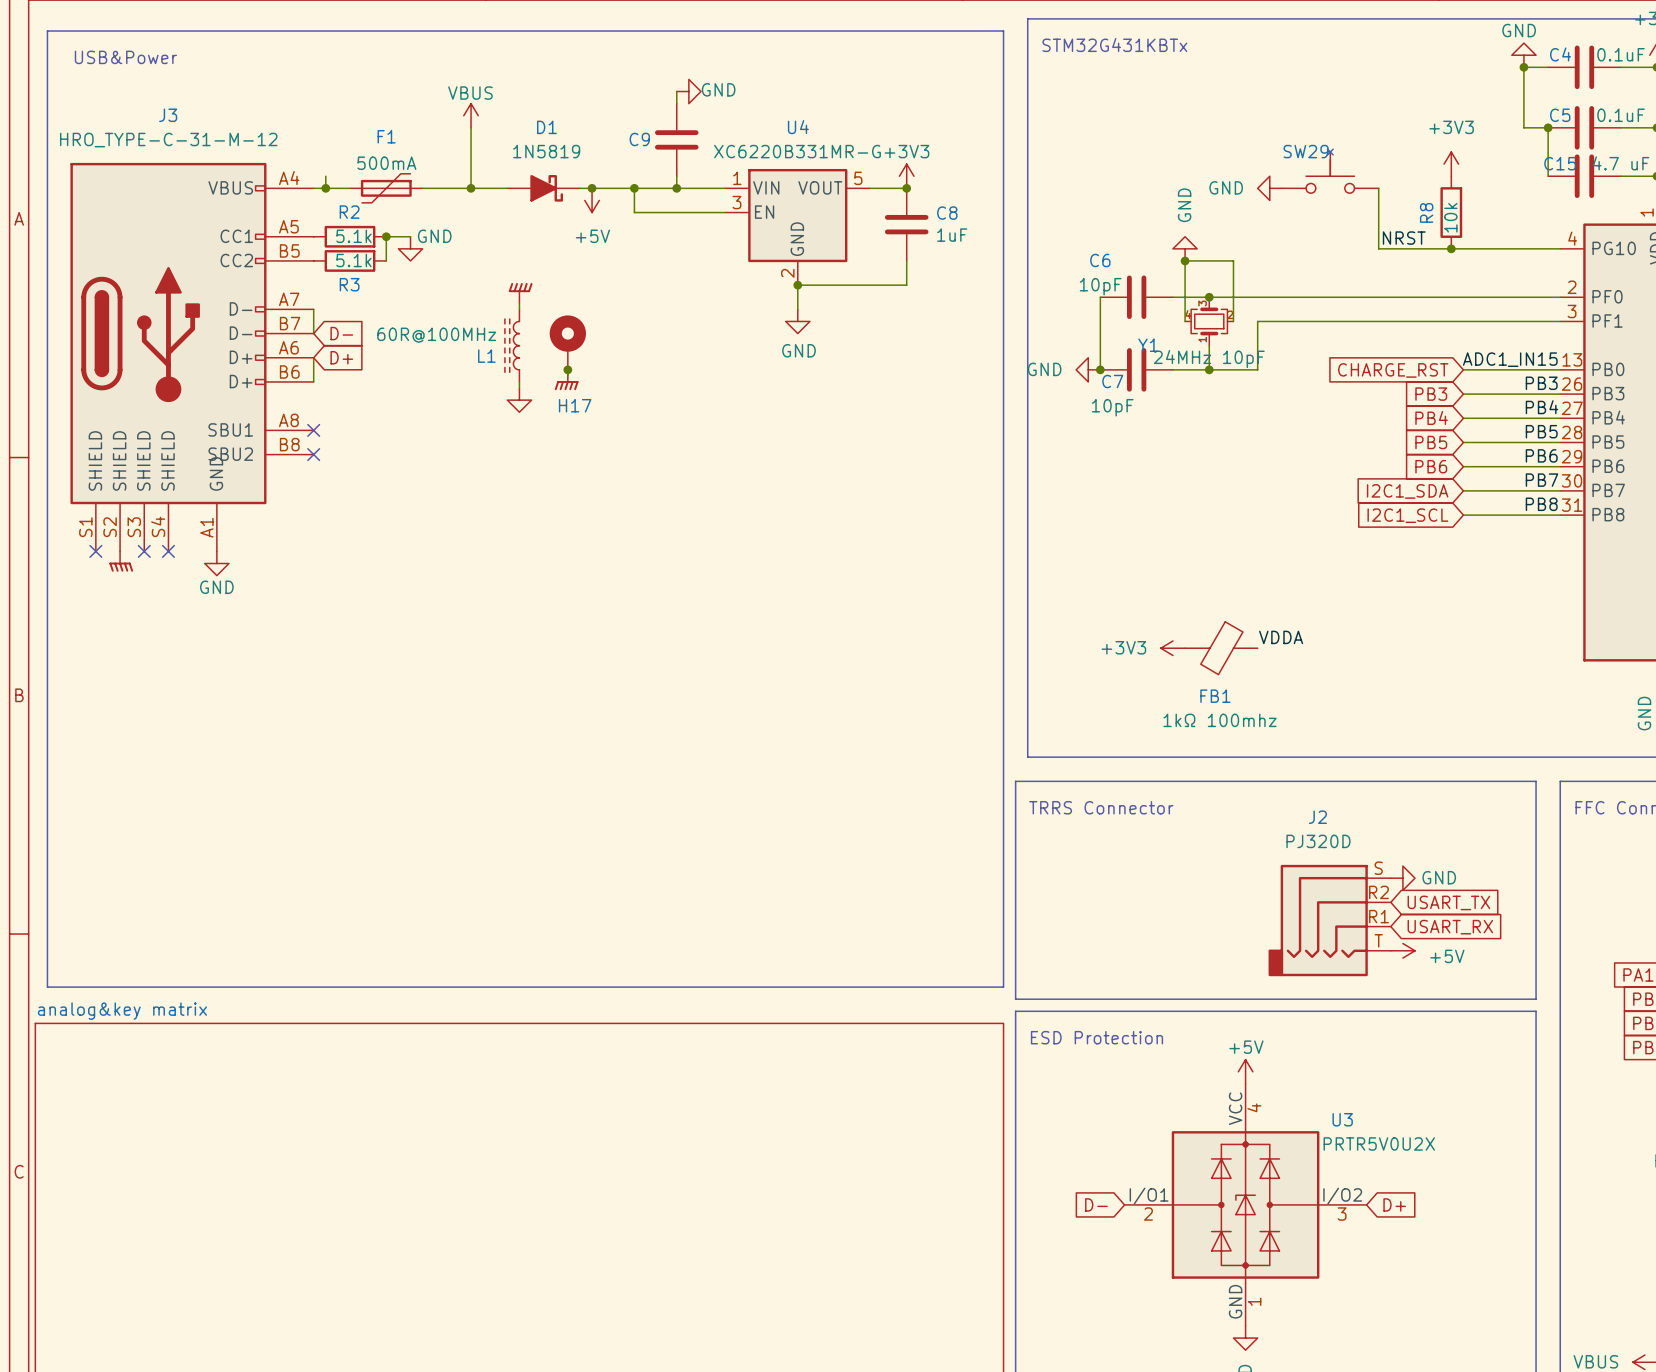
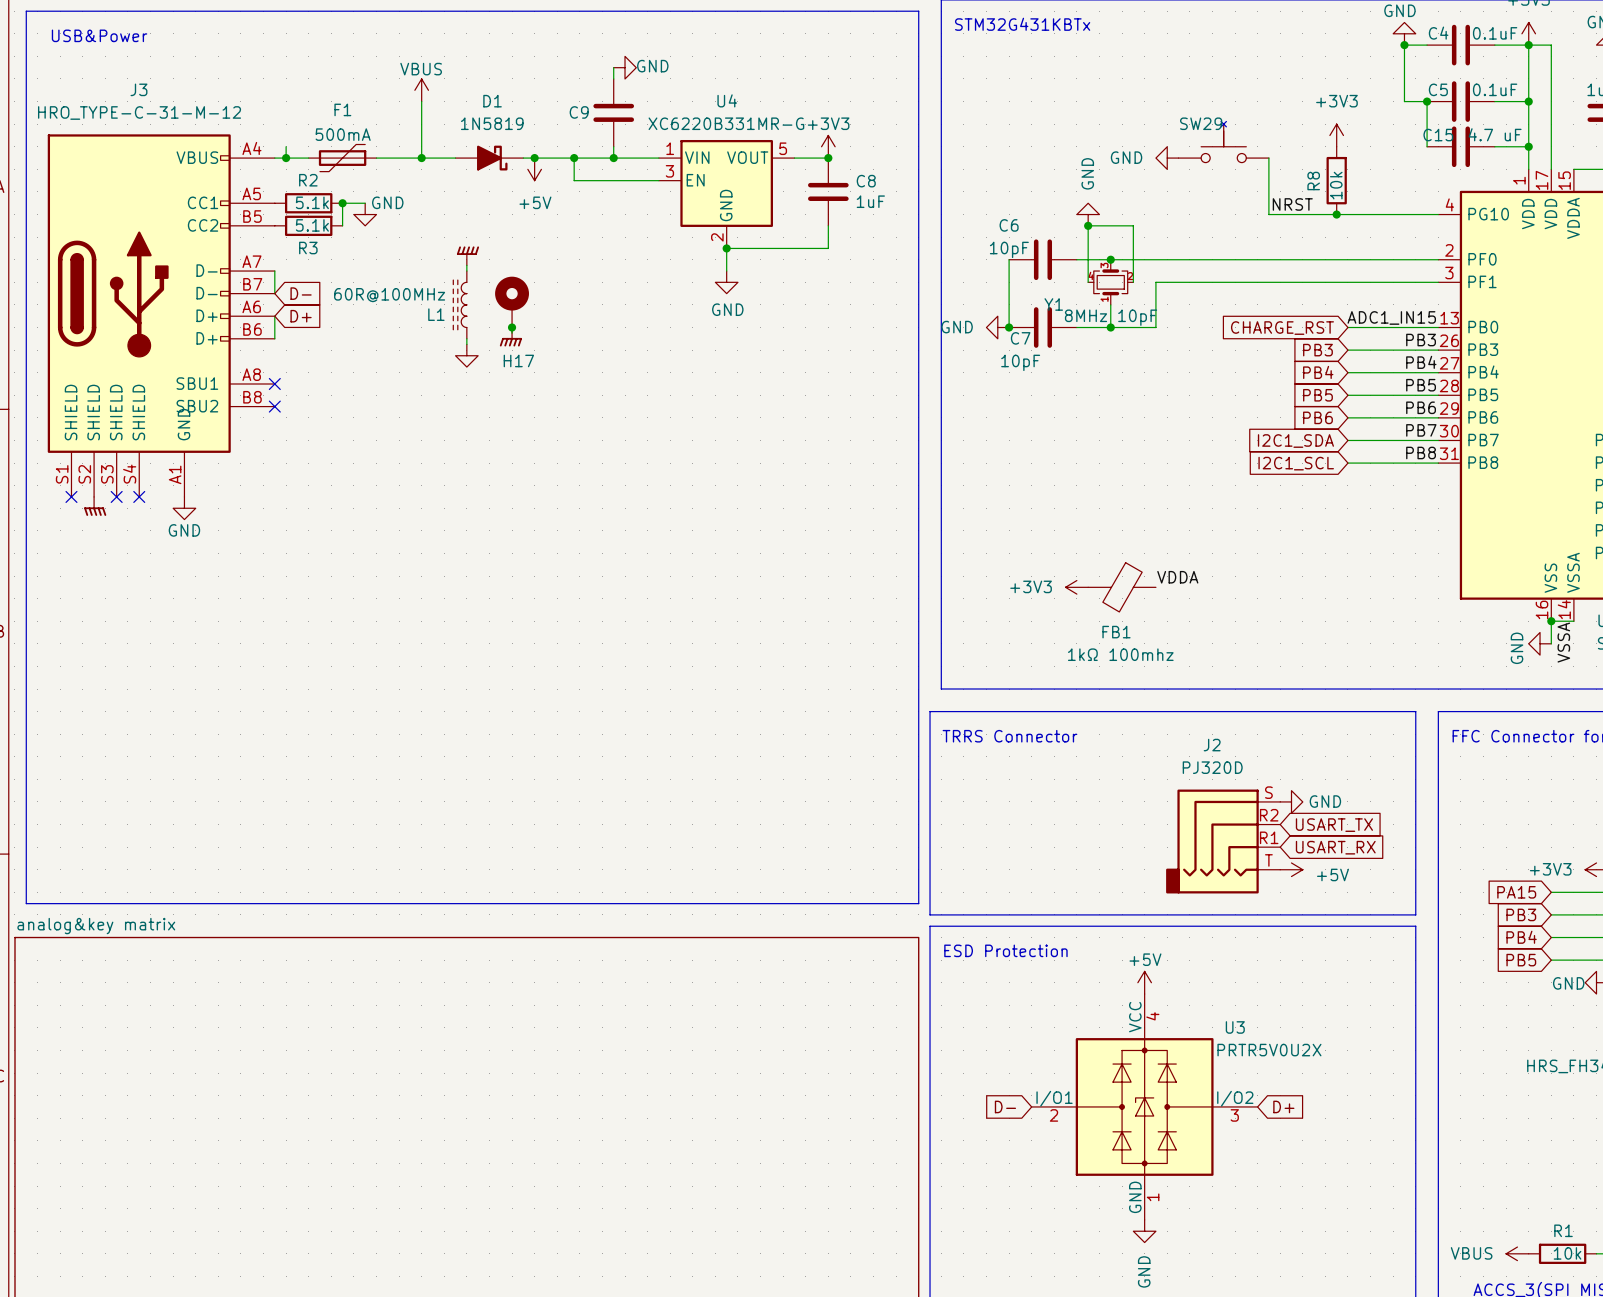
Y1 value: 24MHz 10pF (1209, 359) -> 8MHz 10pF (1111, 317)

